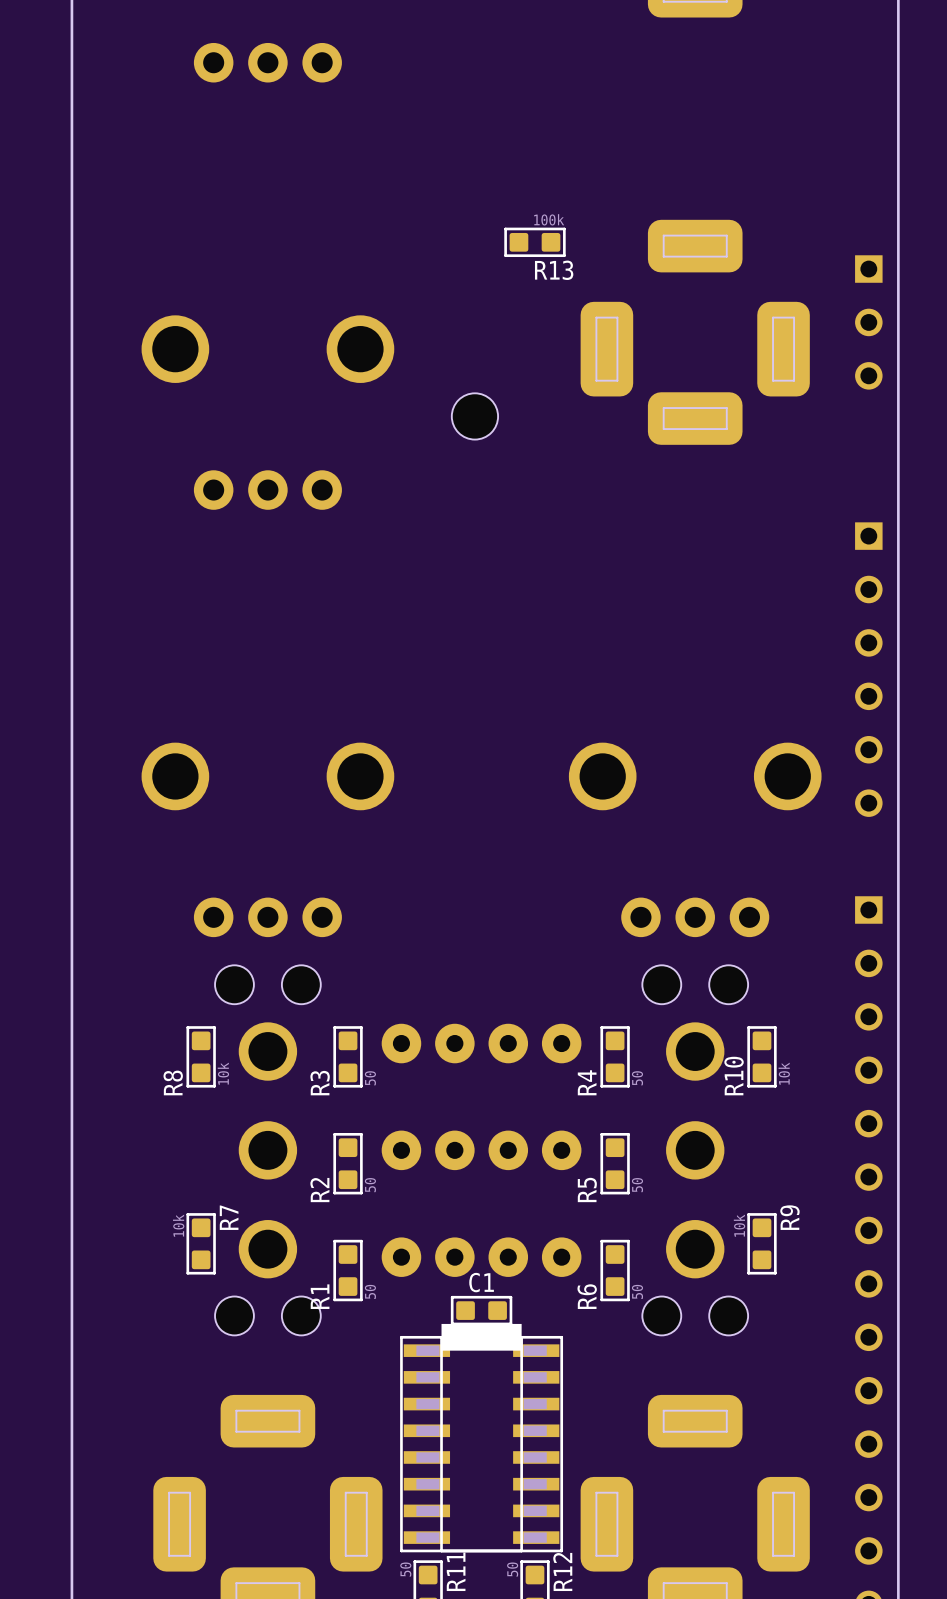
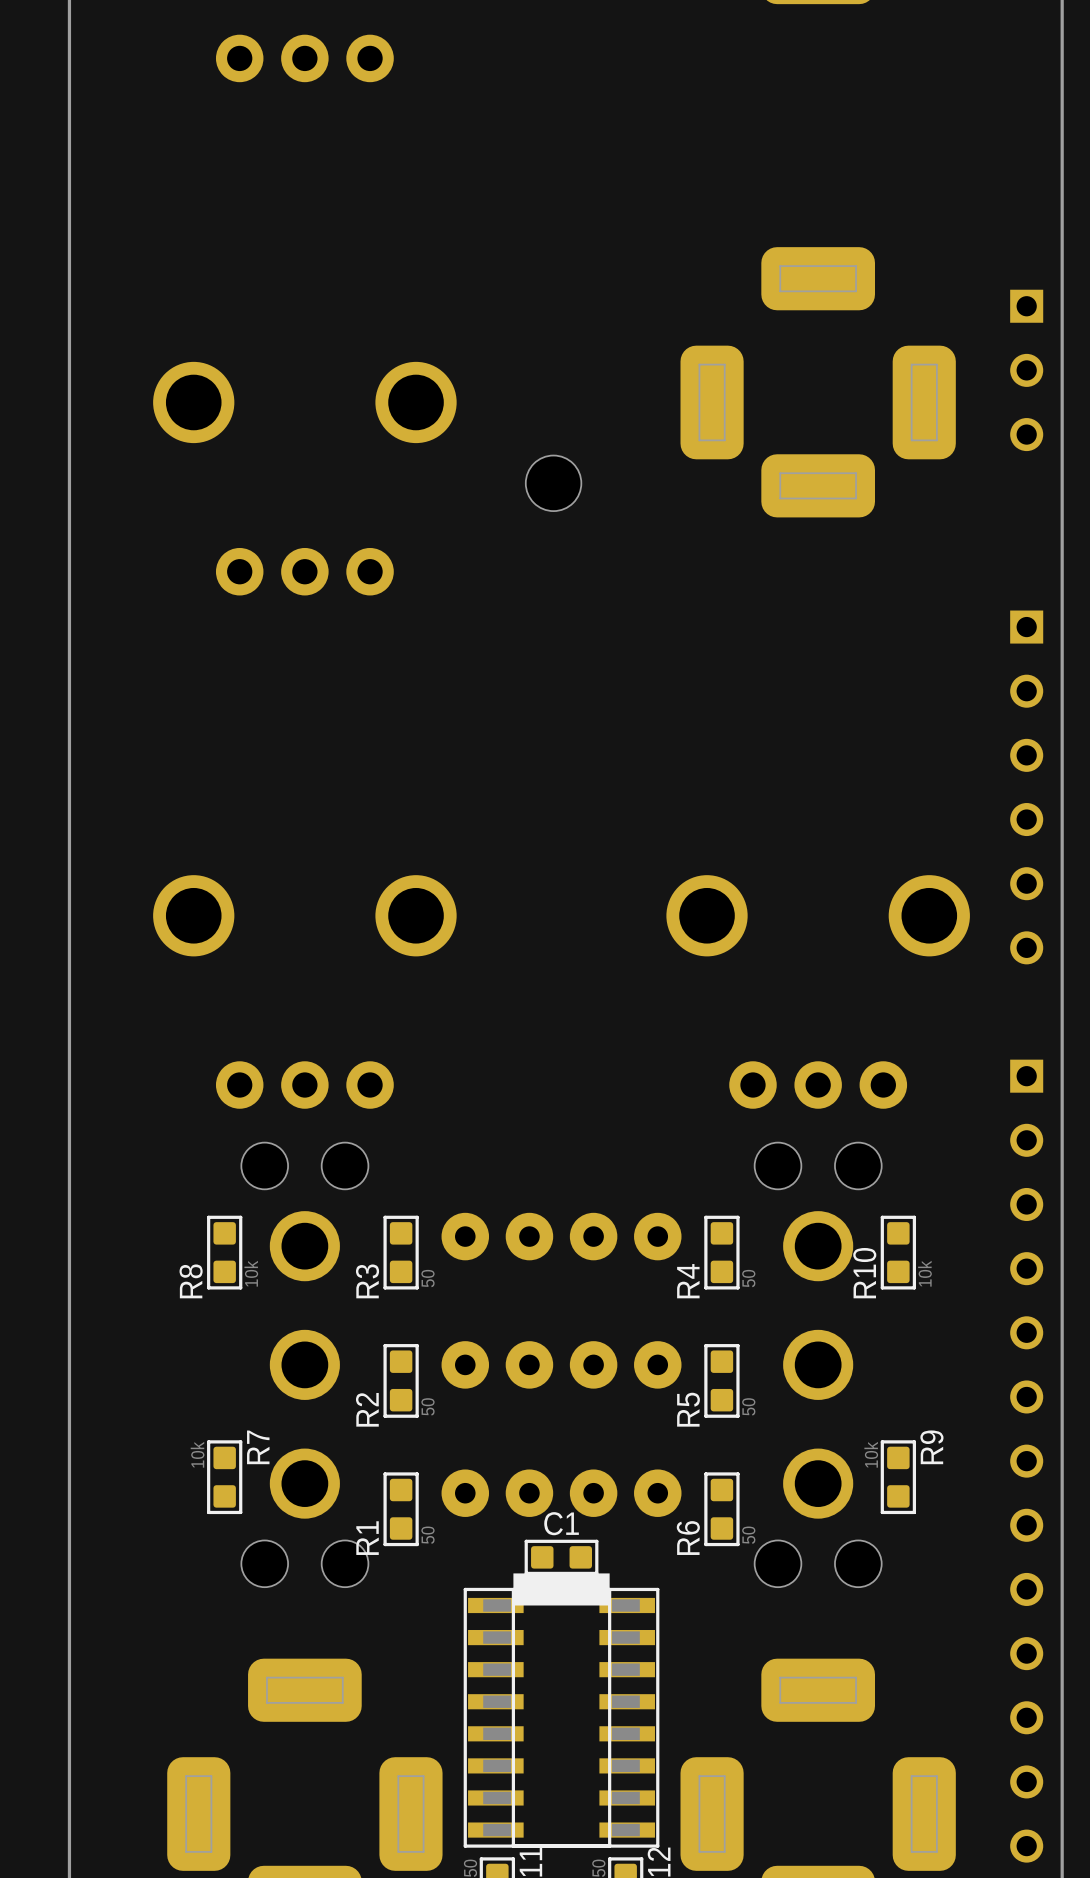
R13: 100k (534, 242) -> none

